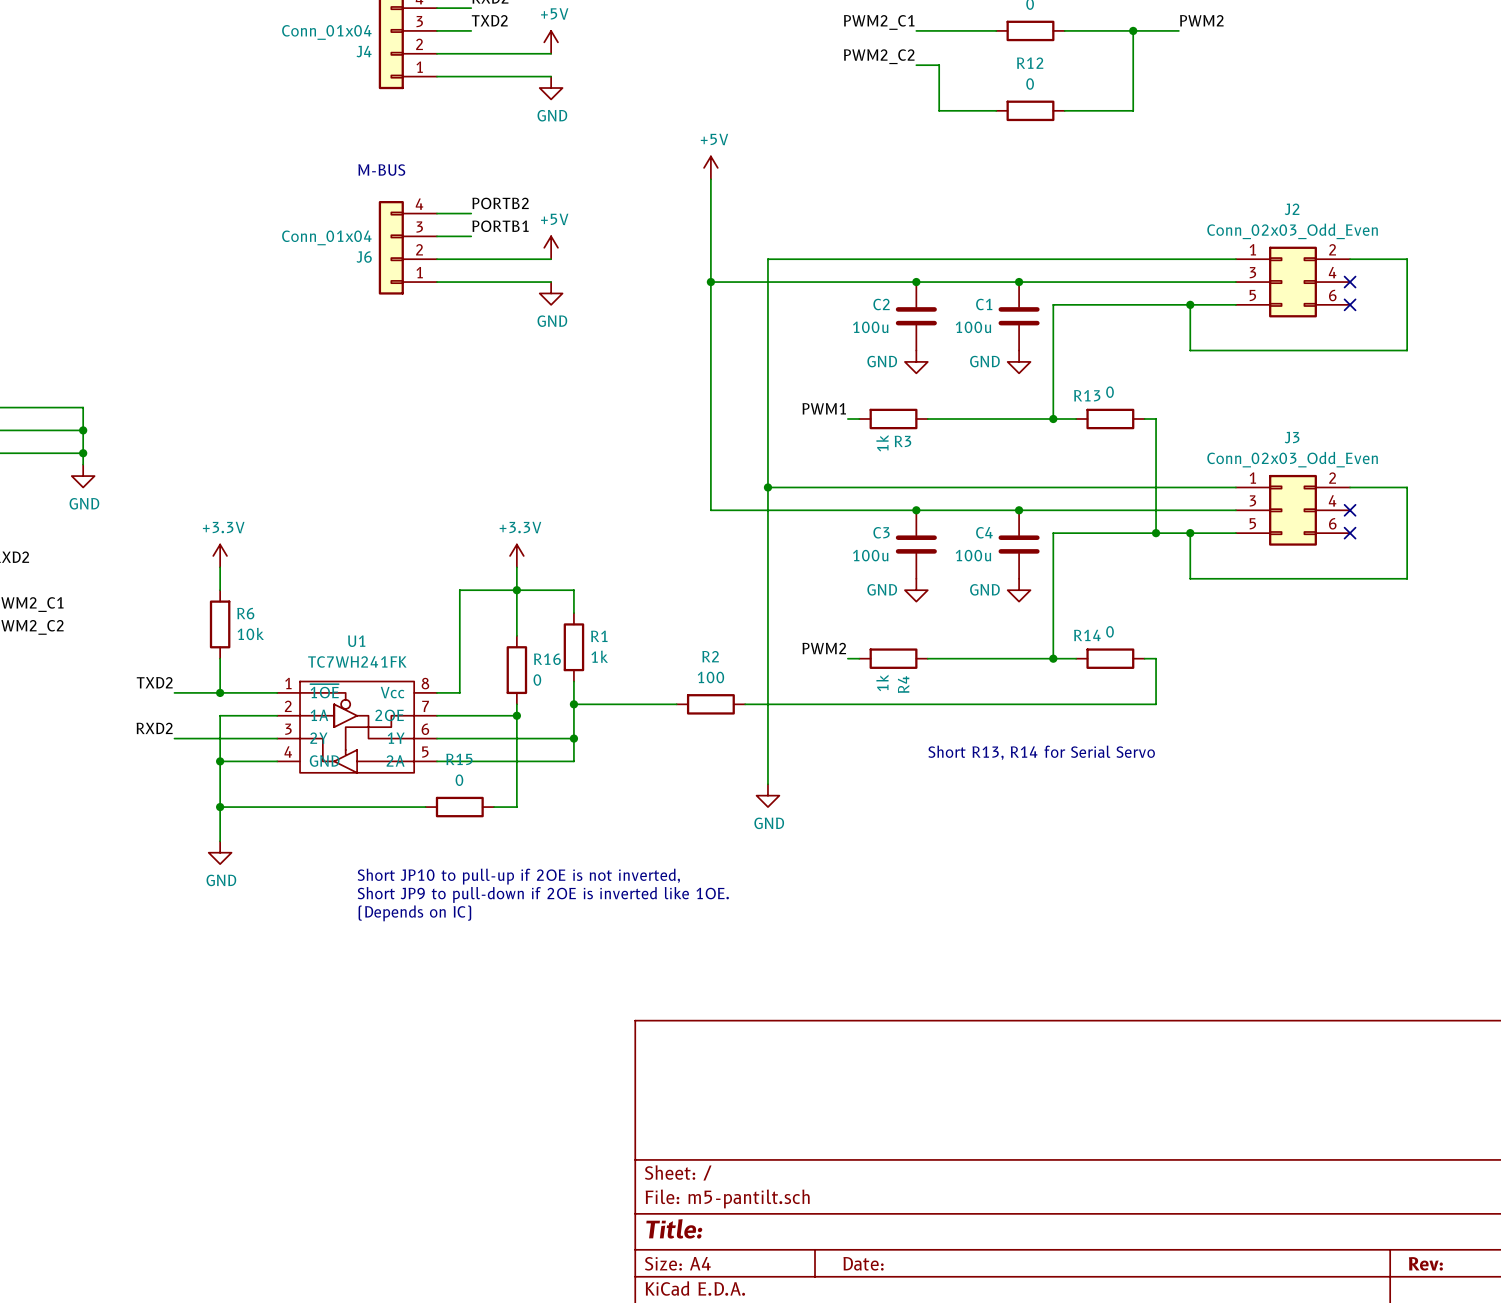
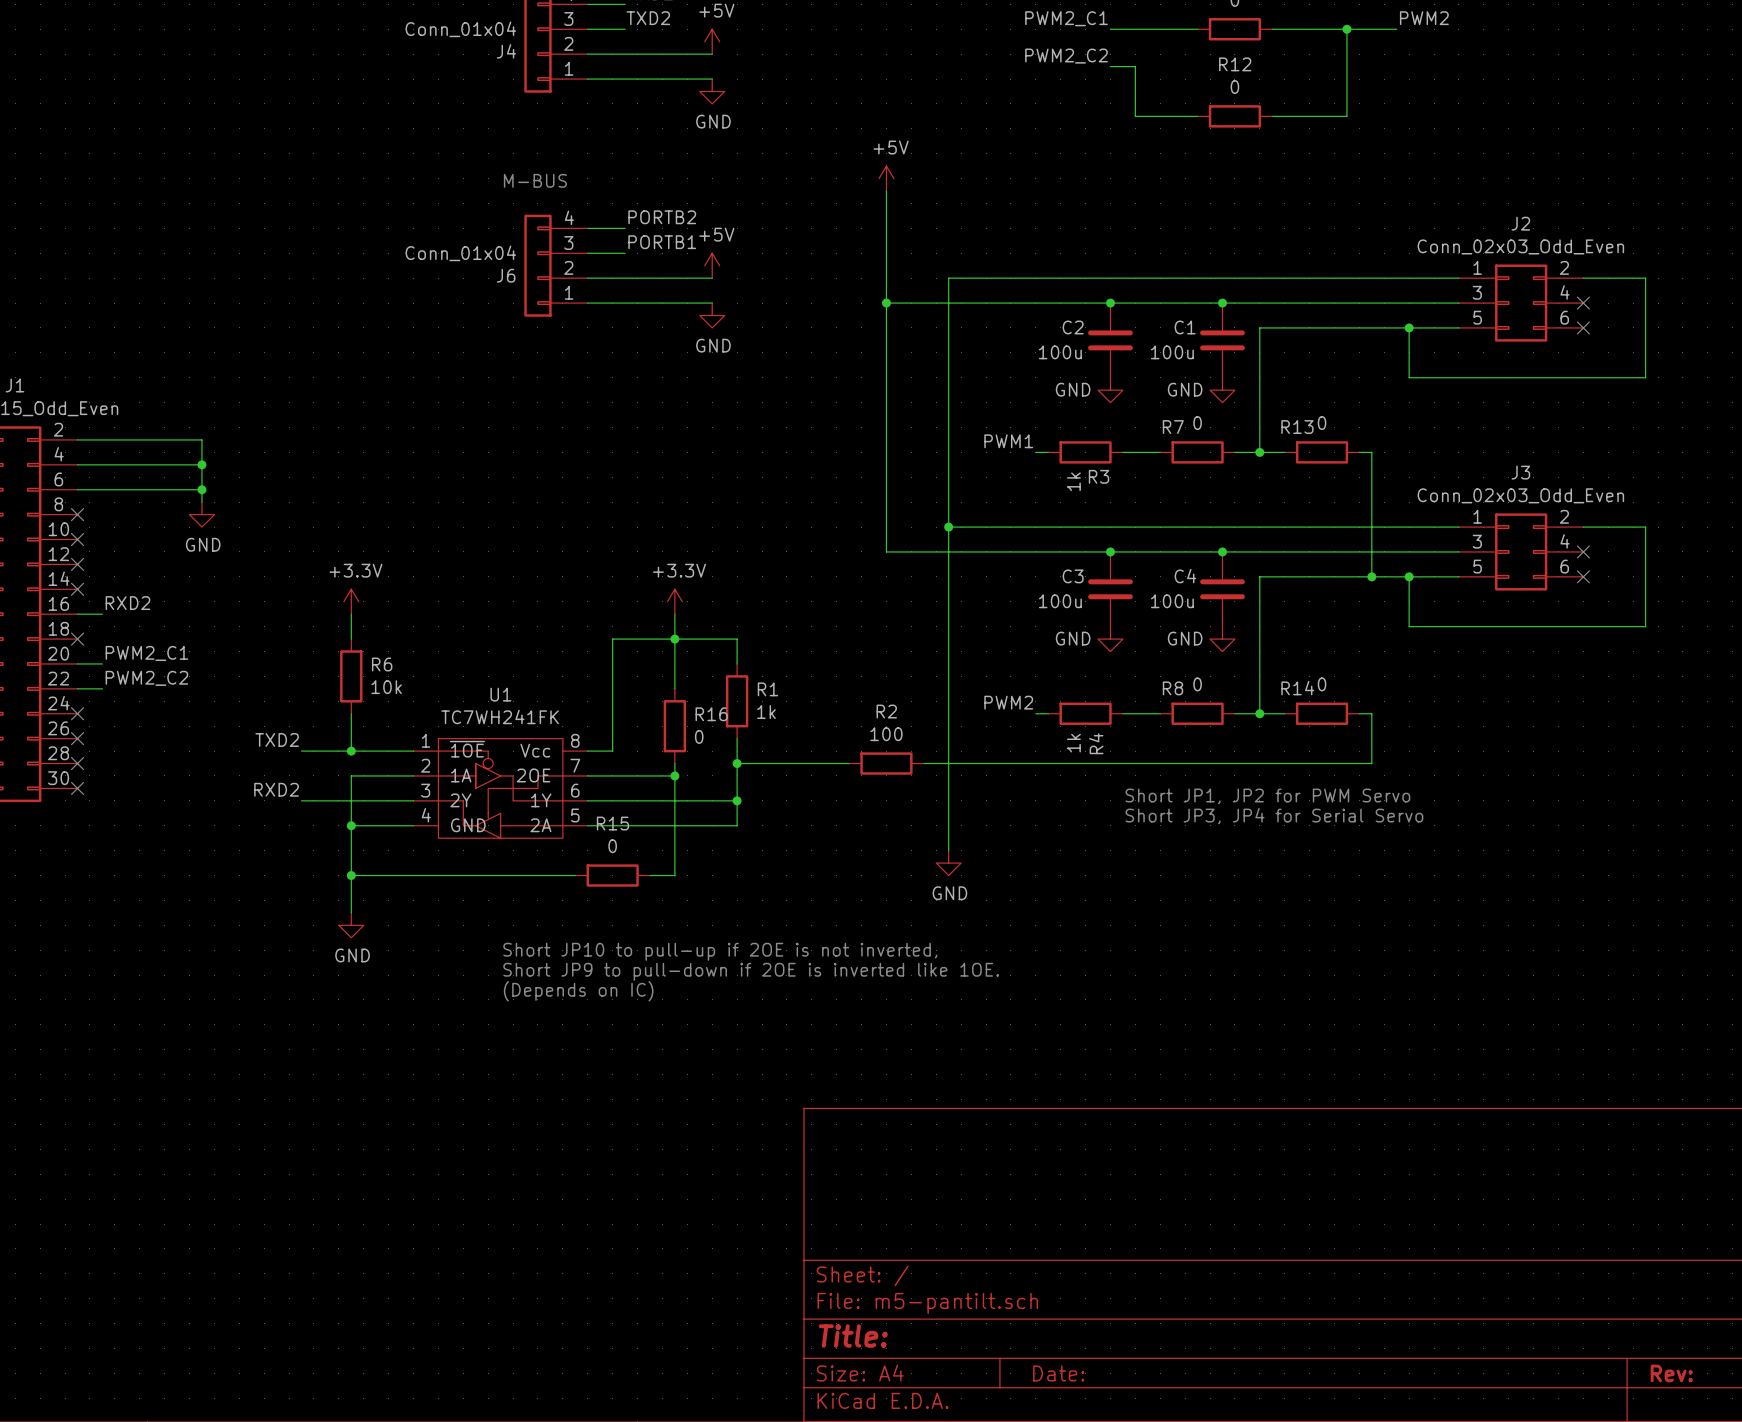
wire: (962, 419) (1030, 419) -> none
R7: none -> 0 (1197, 452)
wire: (962, 658) (1030, 658) -> none
R8: none -> 0 (1197, 713)
text: none -> Short JP1, JP2 for PWM Servo (1267, 796)
text: Short R13, R14 for Serial Servo (1041, 752) -> Short JP3, JP4 for Serial Servo (1274, 816)

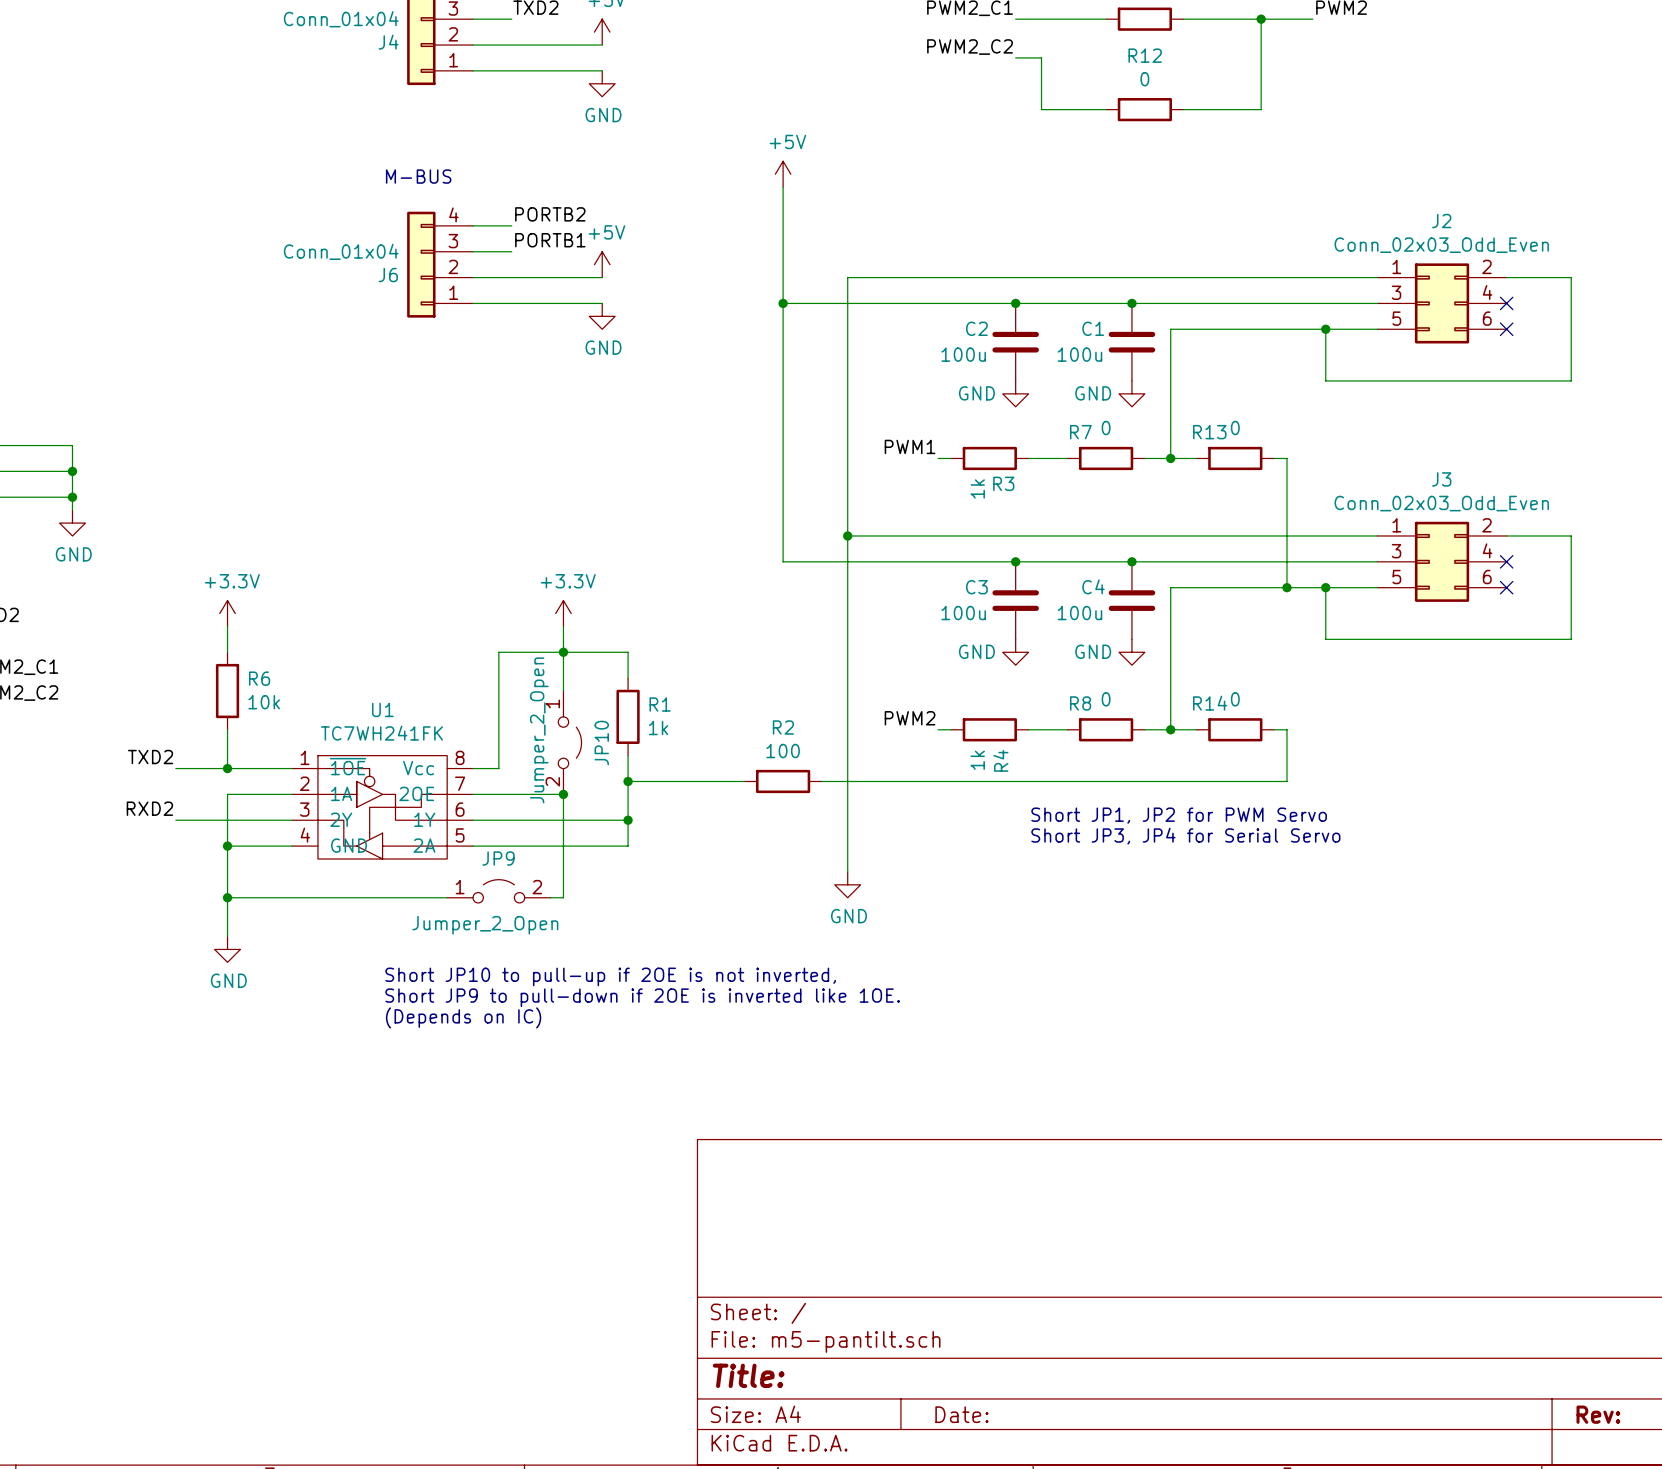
R16: 0 (674, 726) -> none
JP10: none -> Jumper_2_Open (569, 742)
JP9: none -> Jumper_2_Open (498, 891)
R15: 0 (612, 875) -> none

